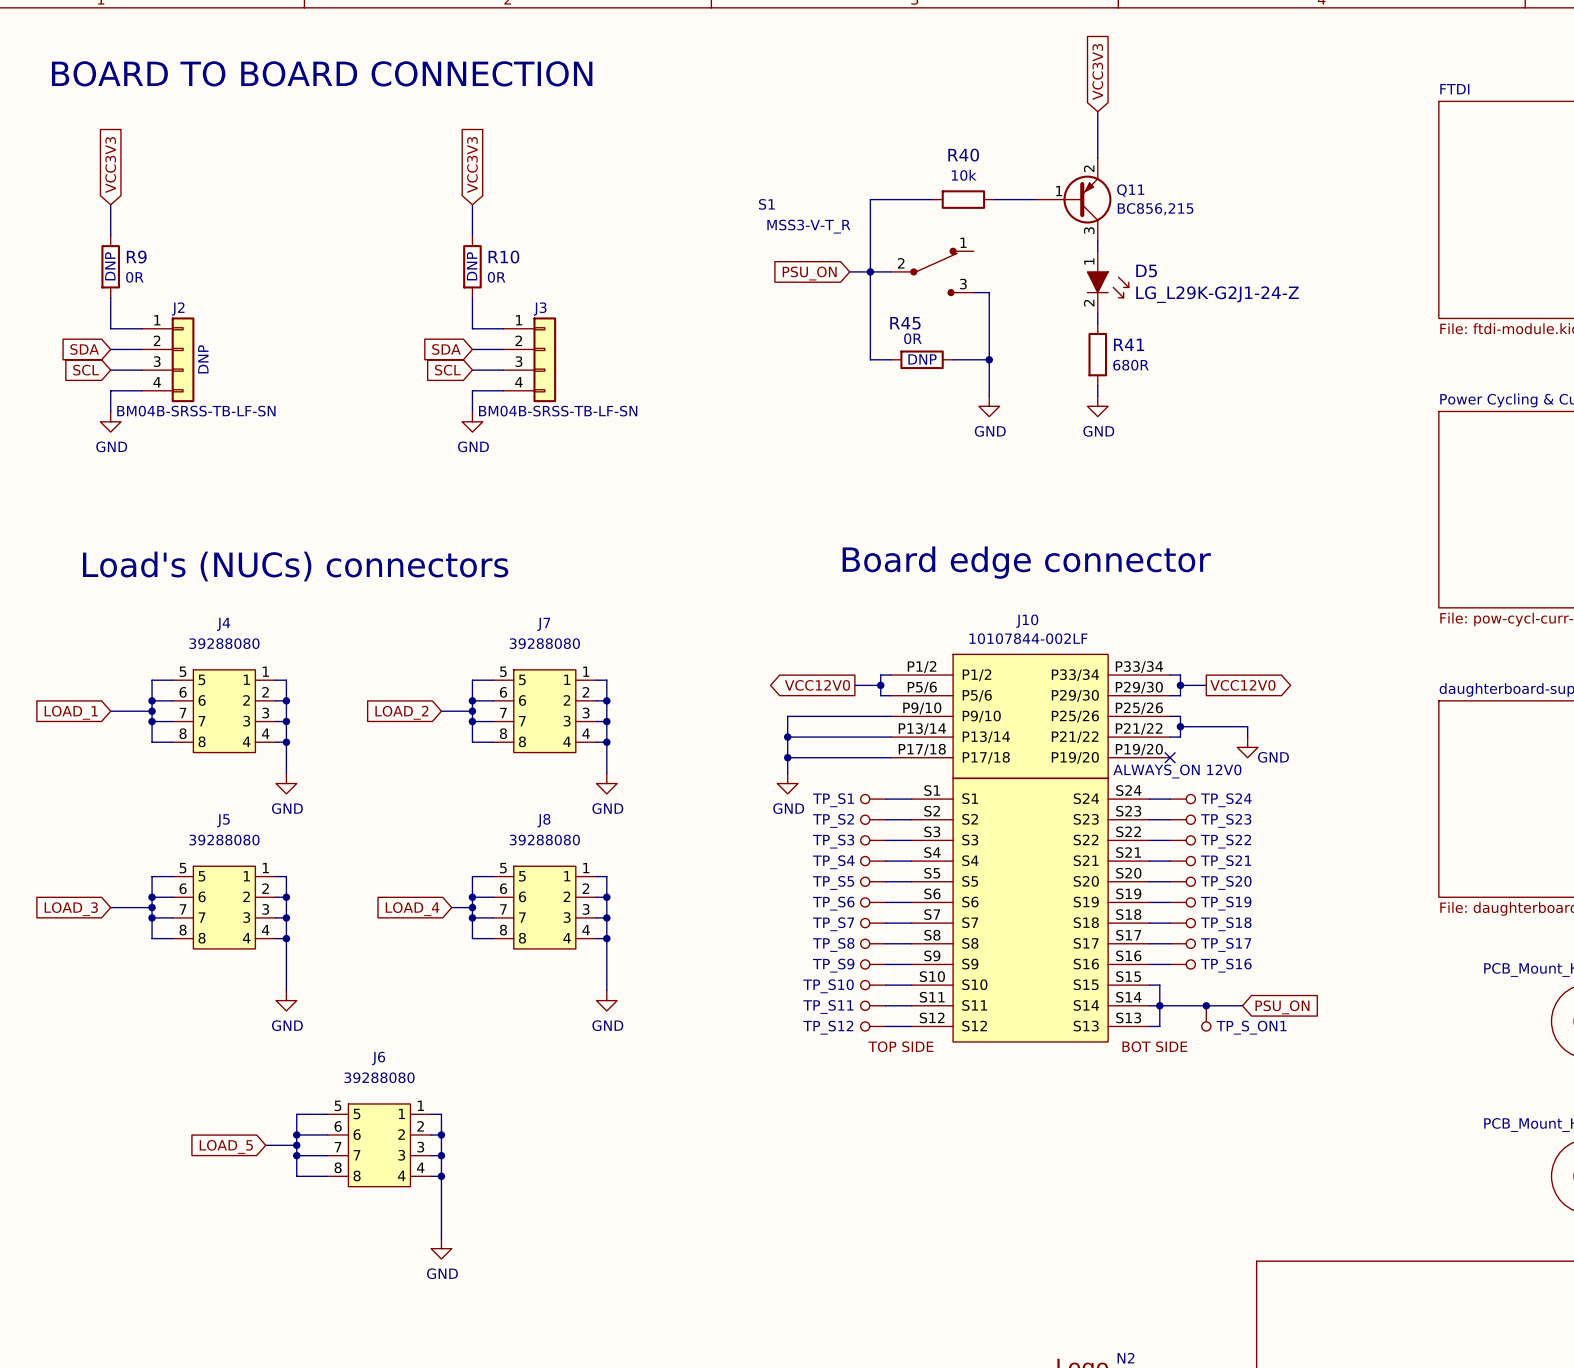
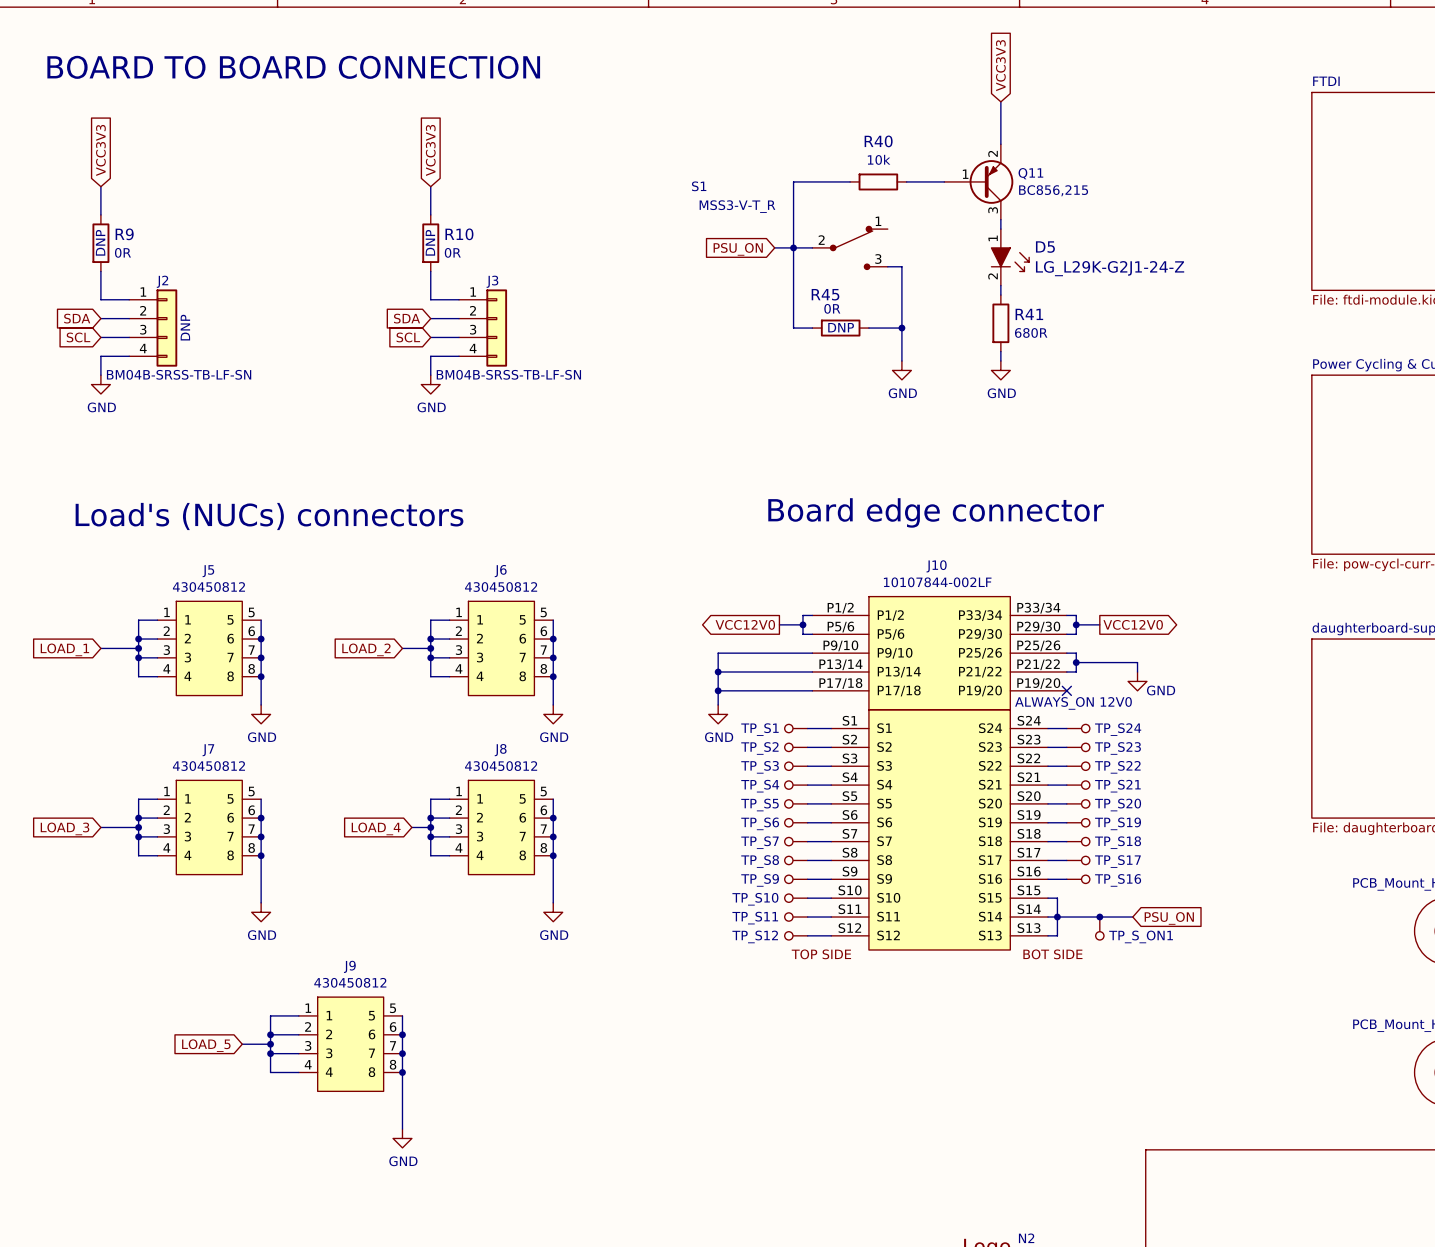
J7 value: 39288080 (544, 643) -> 430450812 (208, 766)
J7 symbol: [493, 669, 597, 753] -> [157, 780, 262, 875]
J4: 39288080 (224, 711) -> none
J5 value: 39288080 (224, 840) -> 430450812 (208, 587)
J8 value: 39288080 (544, 840) -> 430450812 (501, 766)
J5 symbol: [172, 866, 277, 949] -> [157, 601, 262, 696]
J8 symbol: [493, 866, 597, 949] -> [449, 780, 554, 875]
J6 value: 39288080 (379, 1077) -> 430450812 (501, 587)
J6 symbol: [327, 1103, 432, 1187] -> [449, 601, 554, 696]
J9: none -> 430450812 (350, 1044)

